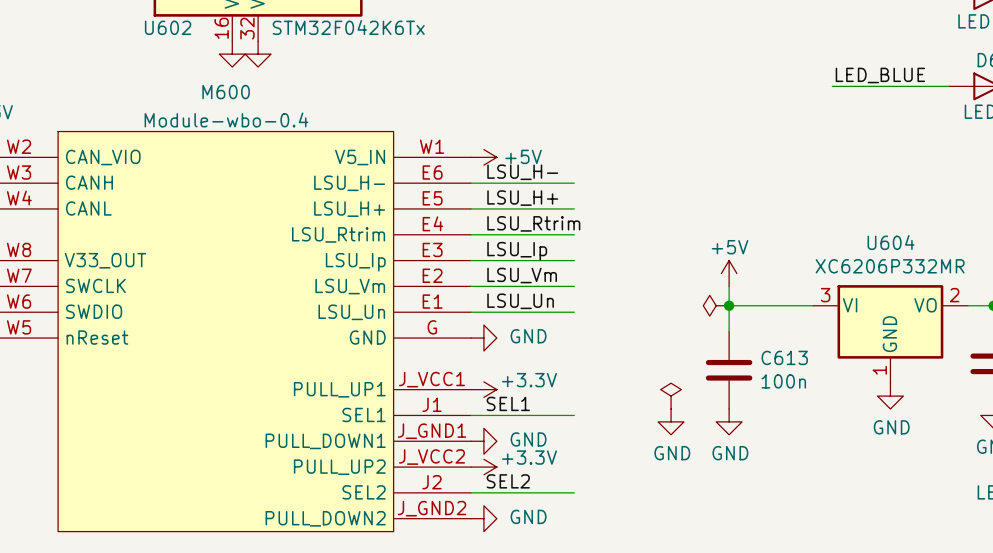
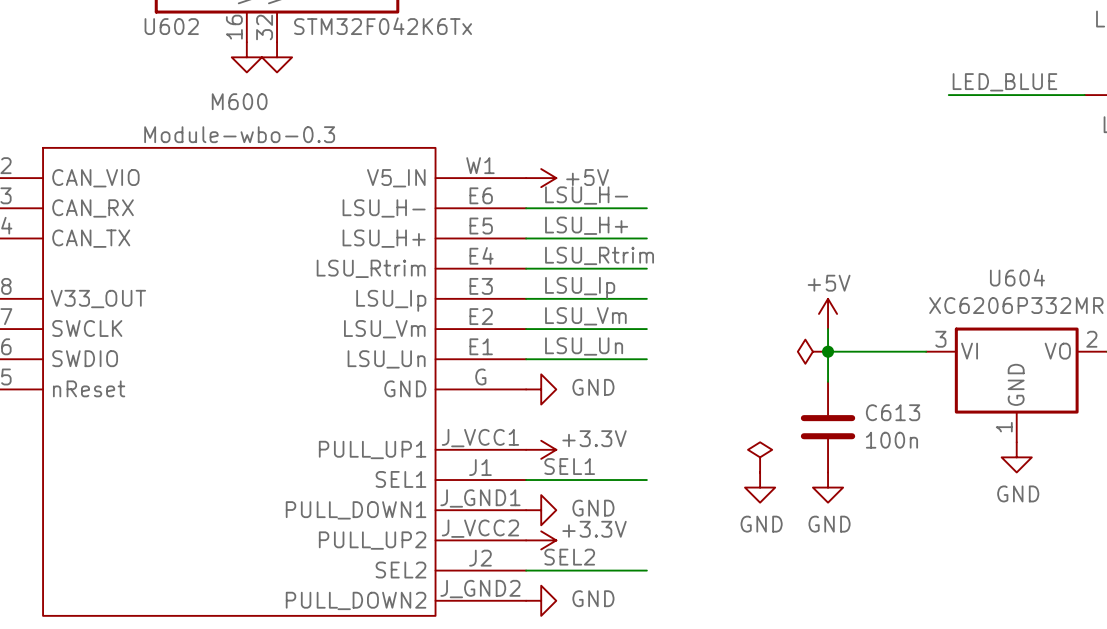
M600 value: Module-wbo-0.4 (226, 119) -> Module-wbo-0.3 (239, 134)
M600 pin name: CANH (89, 182) -> CAN_RX (93, 208)
M600 pin name: CANL (88, 208) -> CAN_TX (91, 238)

